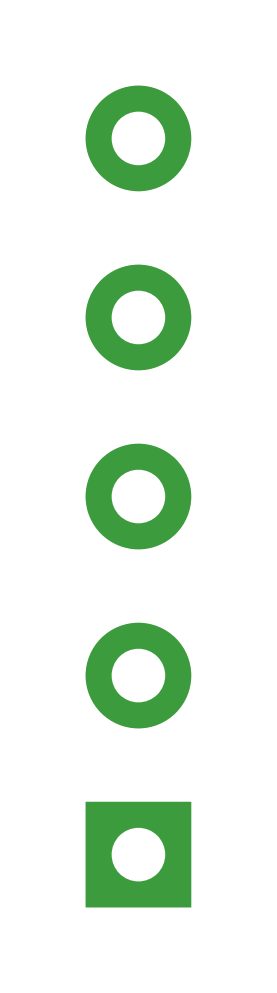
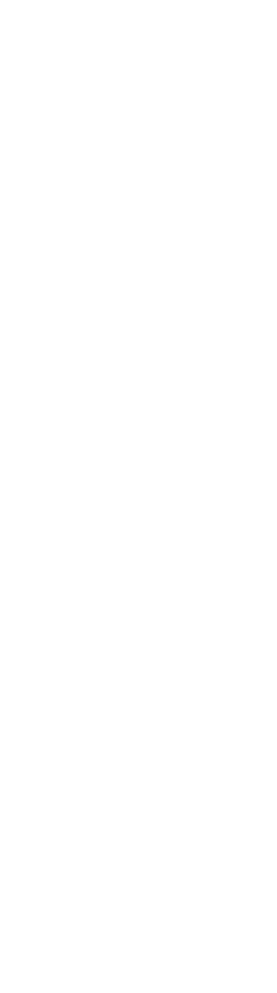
part: (138, 496) -> none

